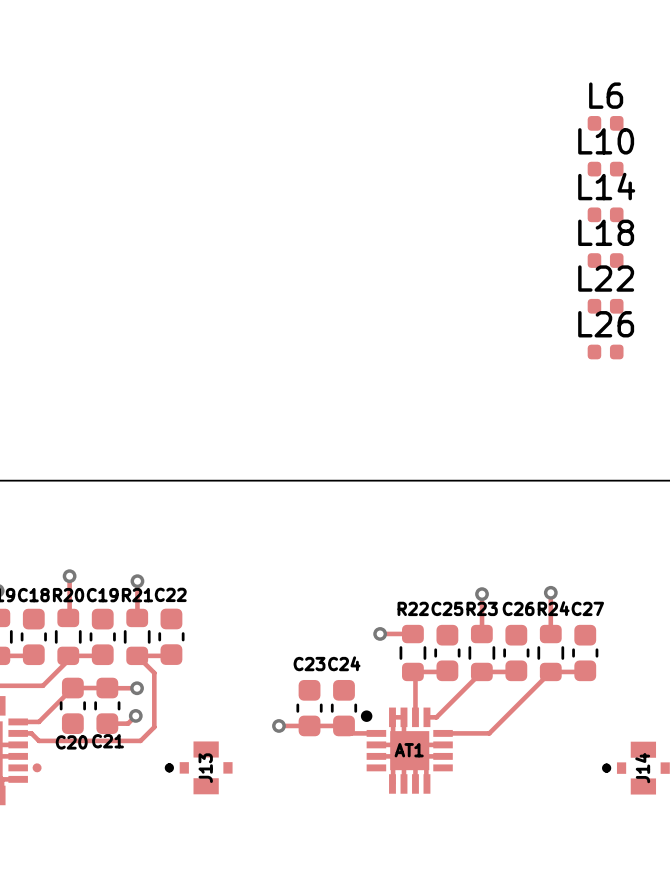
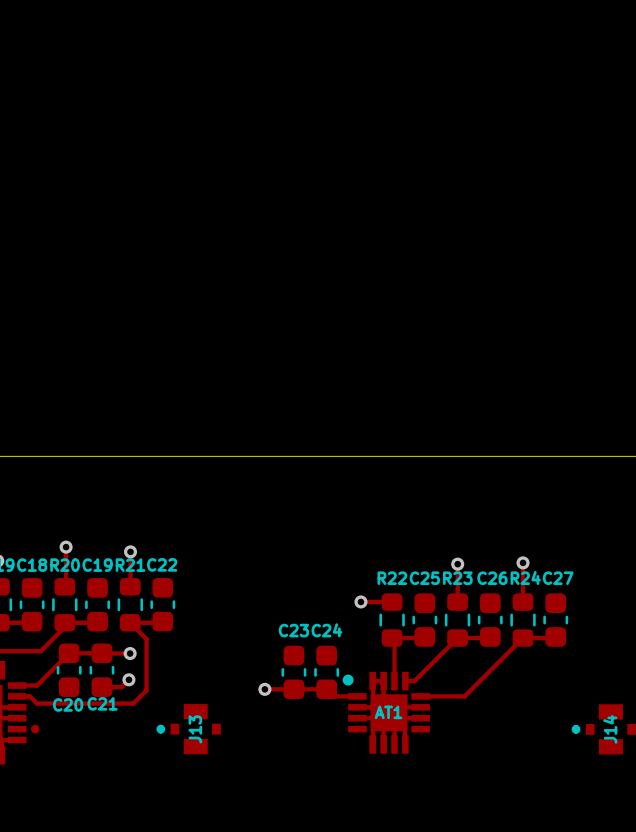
L6: (605, 123) -> none
L10: (605, 169) -> none
L14: (605, 214) -> none
L18: (605, 260) -> none
L22: (605, 306) -> none
L26: (605, 351) -> none

